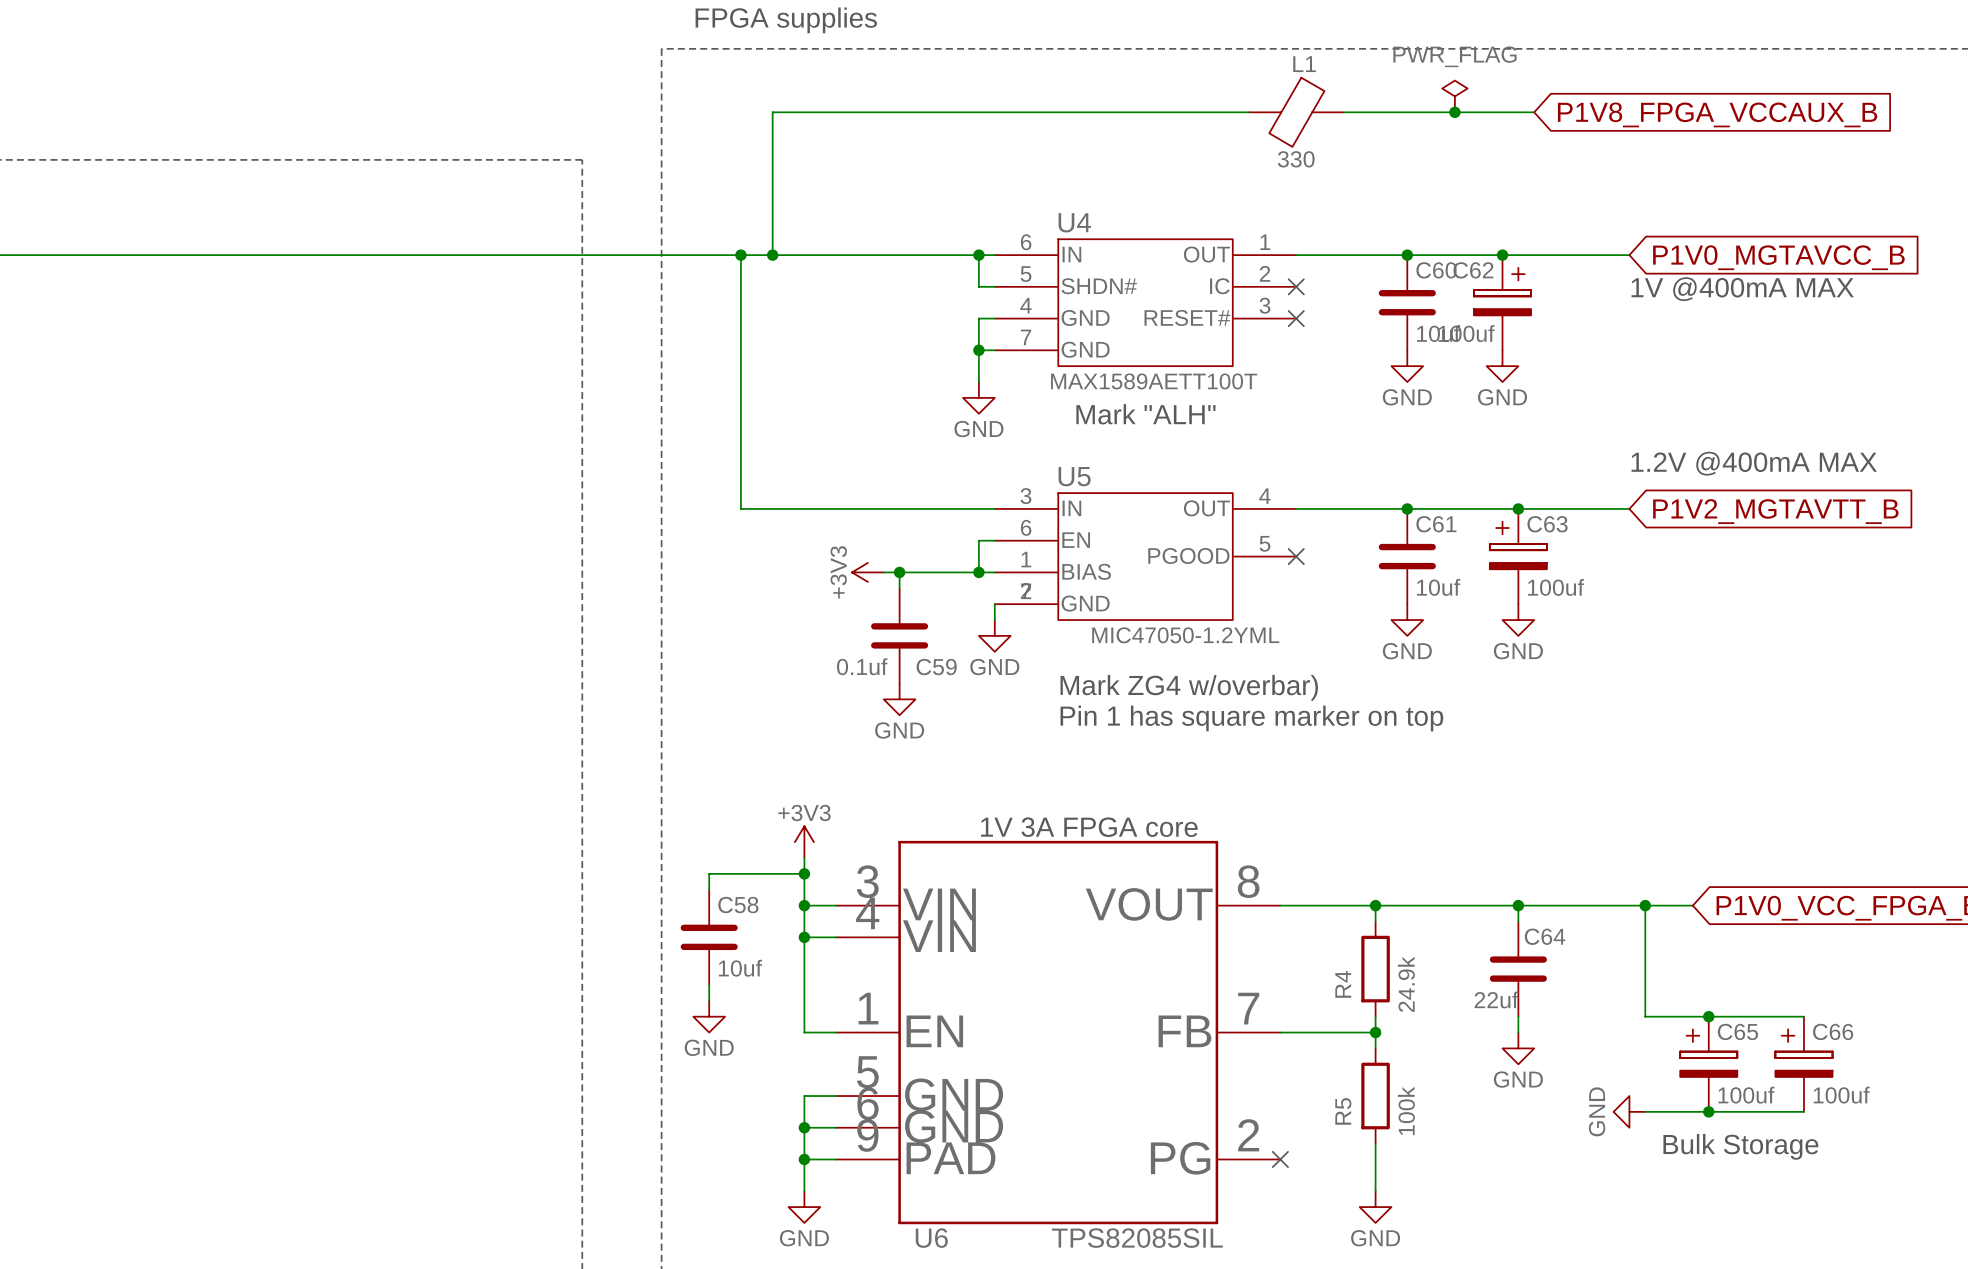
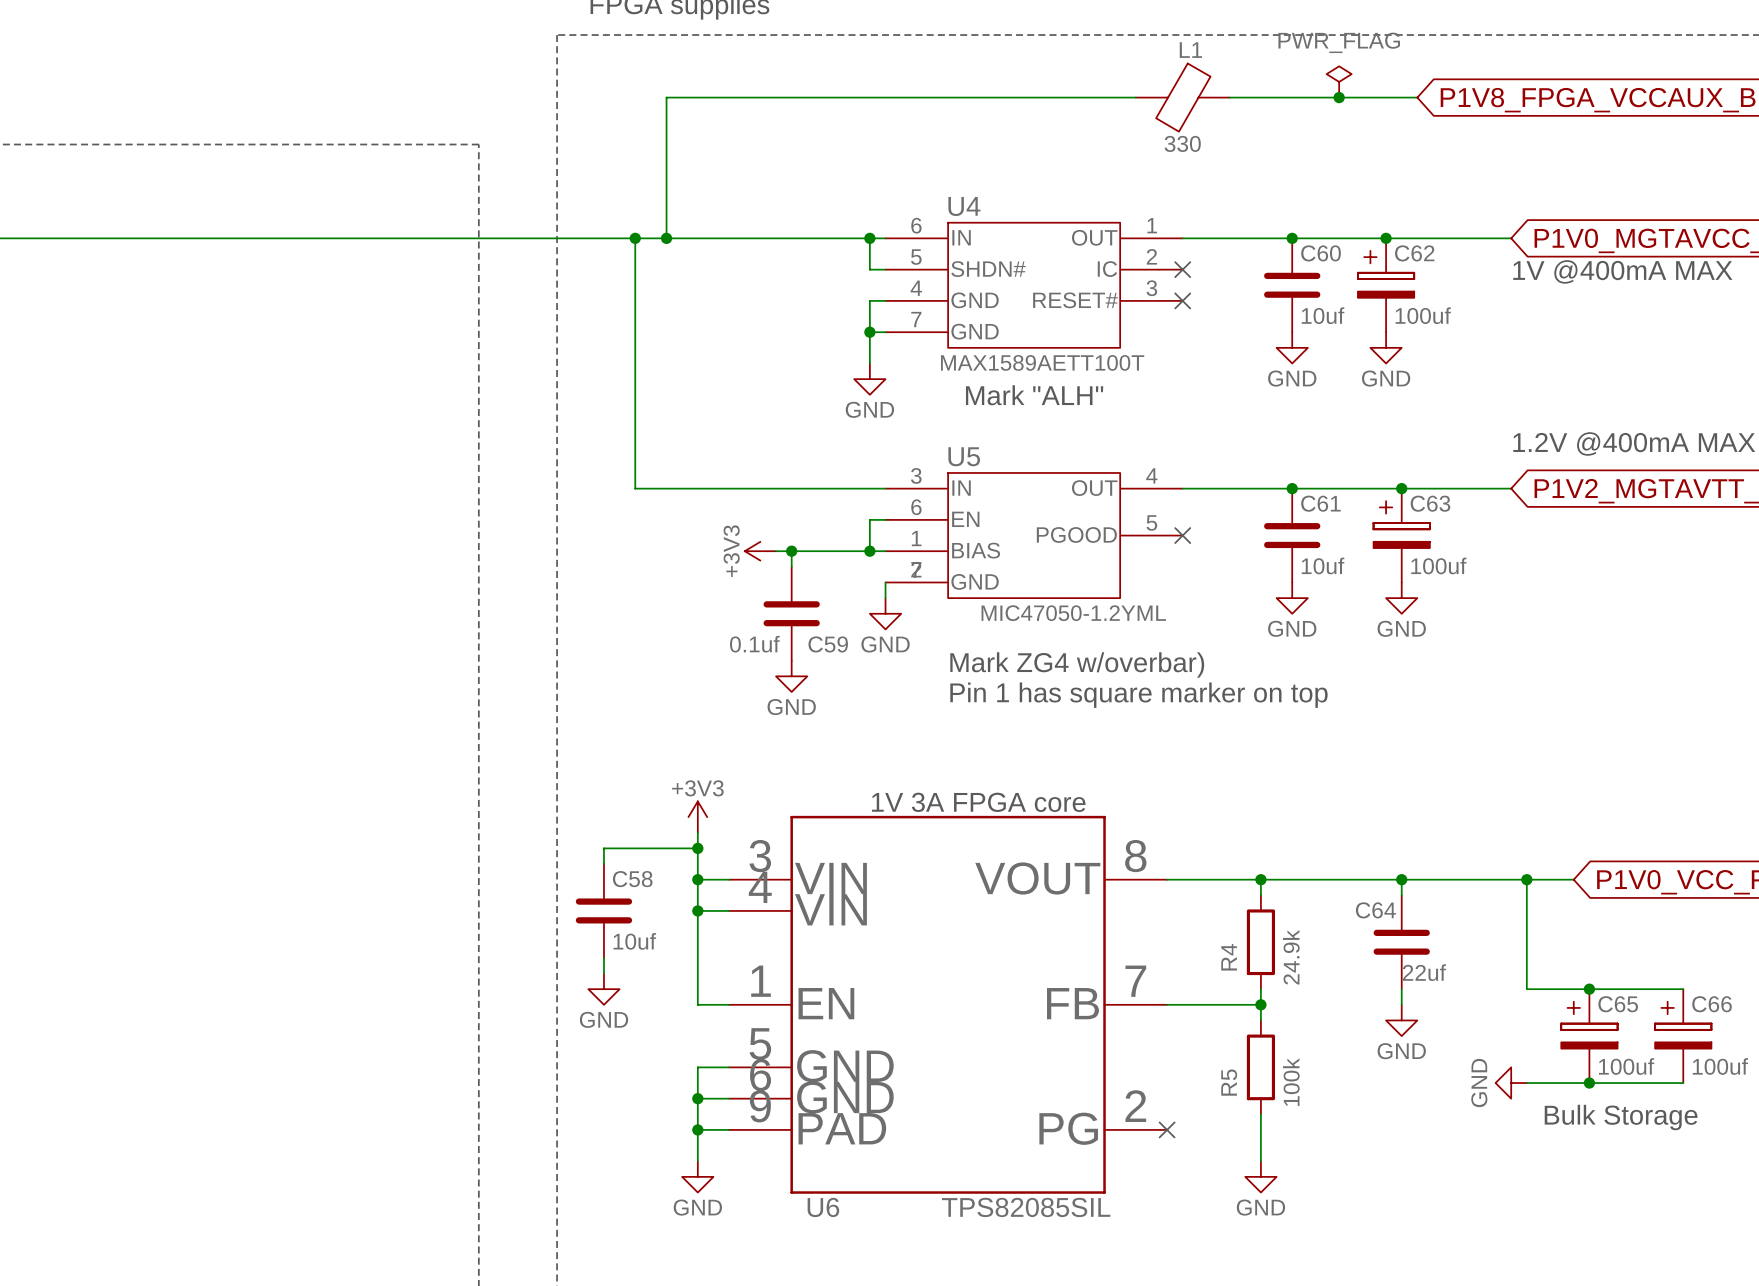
C62 flip: as is (1502, 291) -> left-right (1386, 274)
C64 name position: C64 (1545, 936) -> C64 (1375, 910)
C64 value position: 22uf (1496, 999) -> 22uf (1424, 972)

